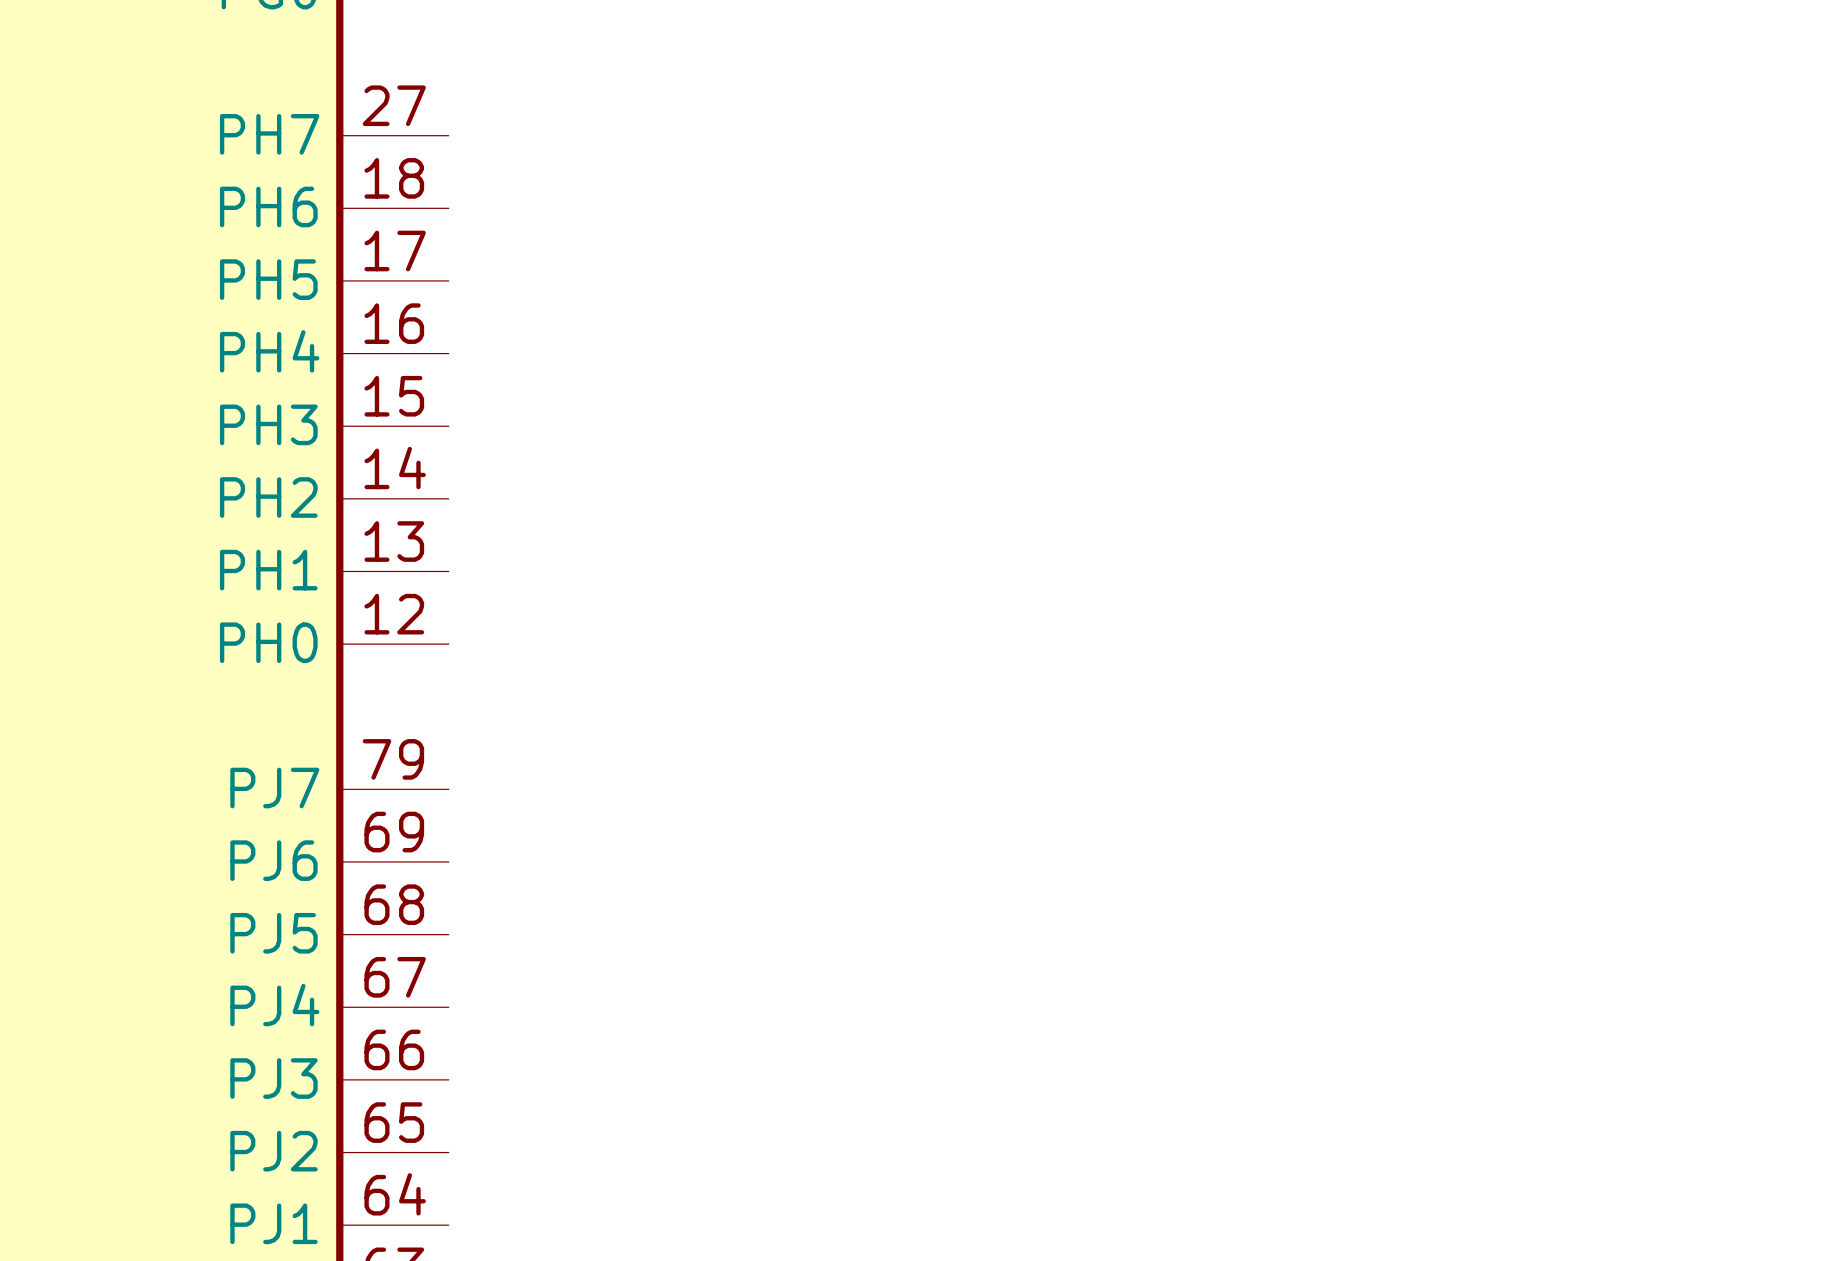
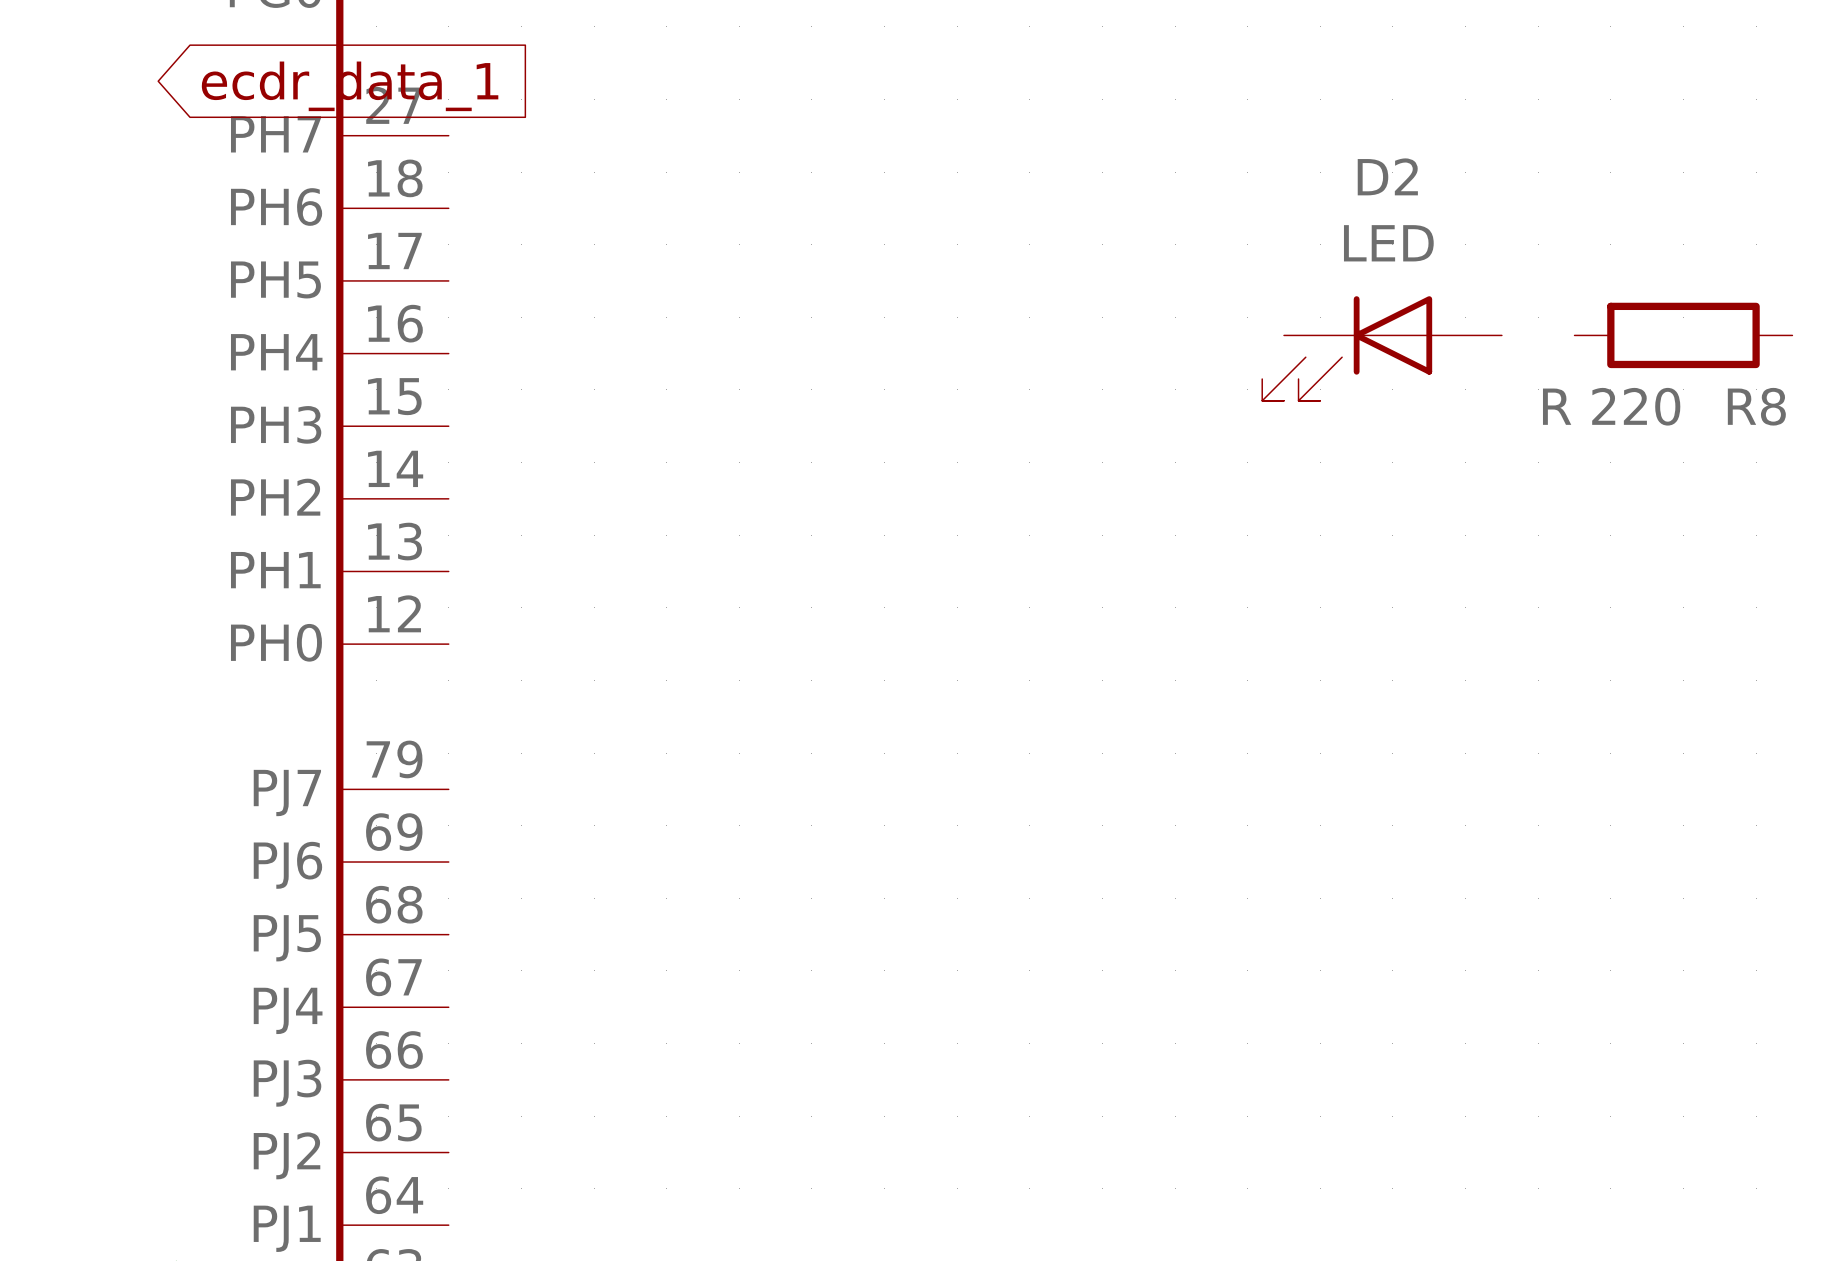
global label: none -> ecdr_data_1 (350, 86)
R8: none -> R 220 (1683, 335)
D2: none -> LED (1382, 348)

